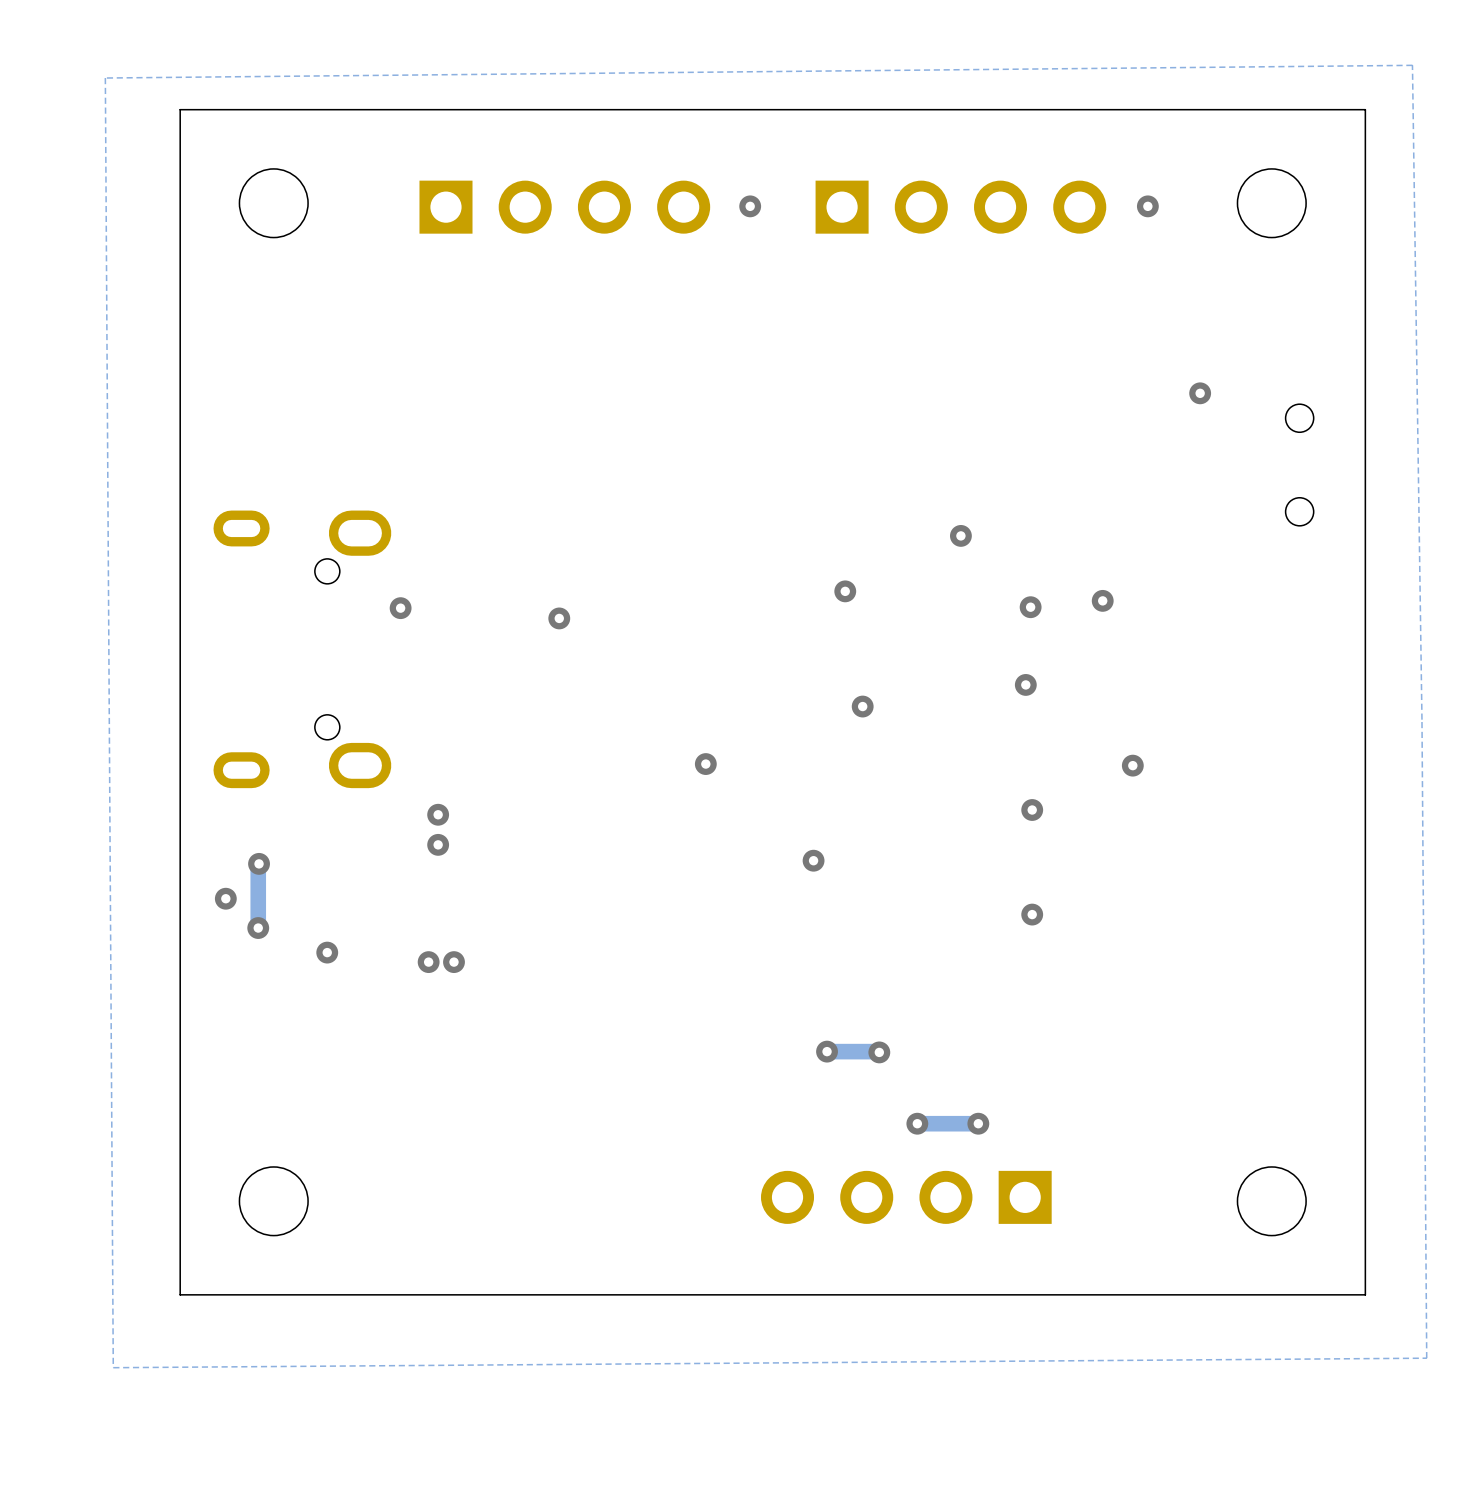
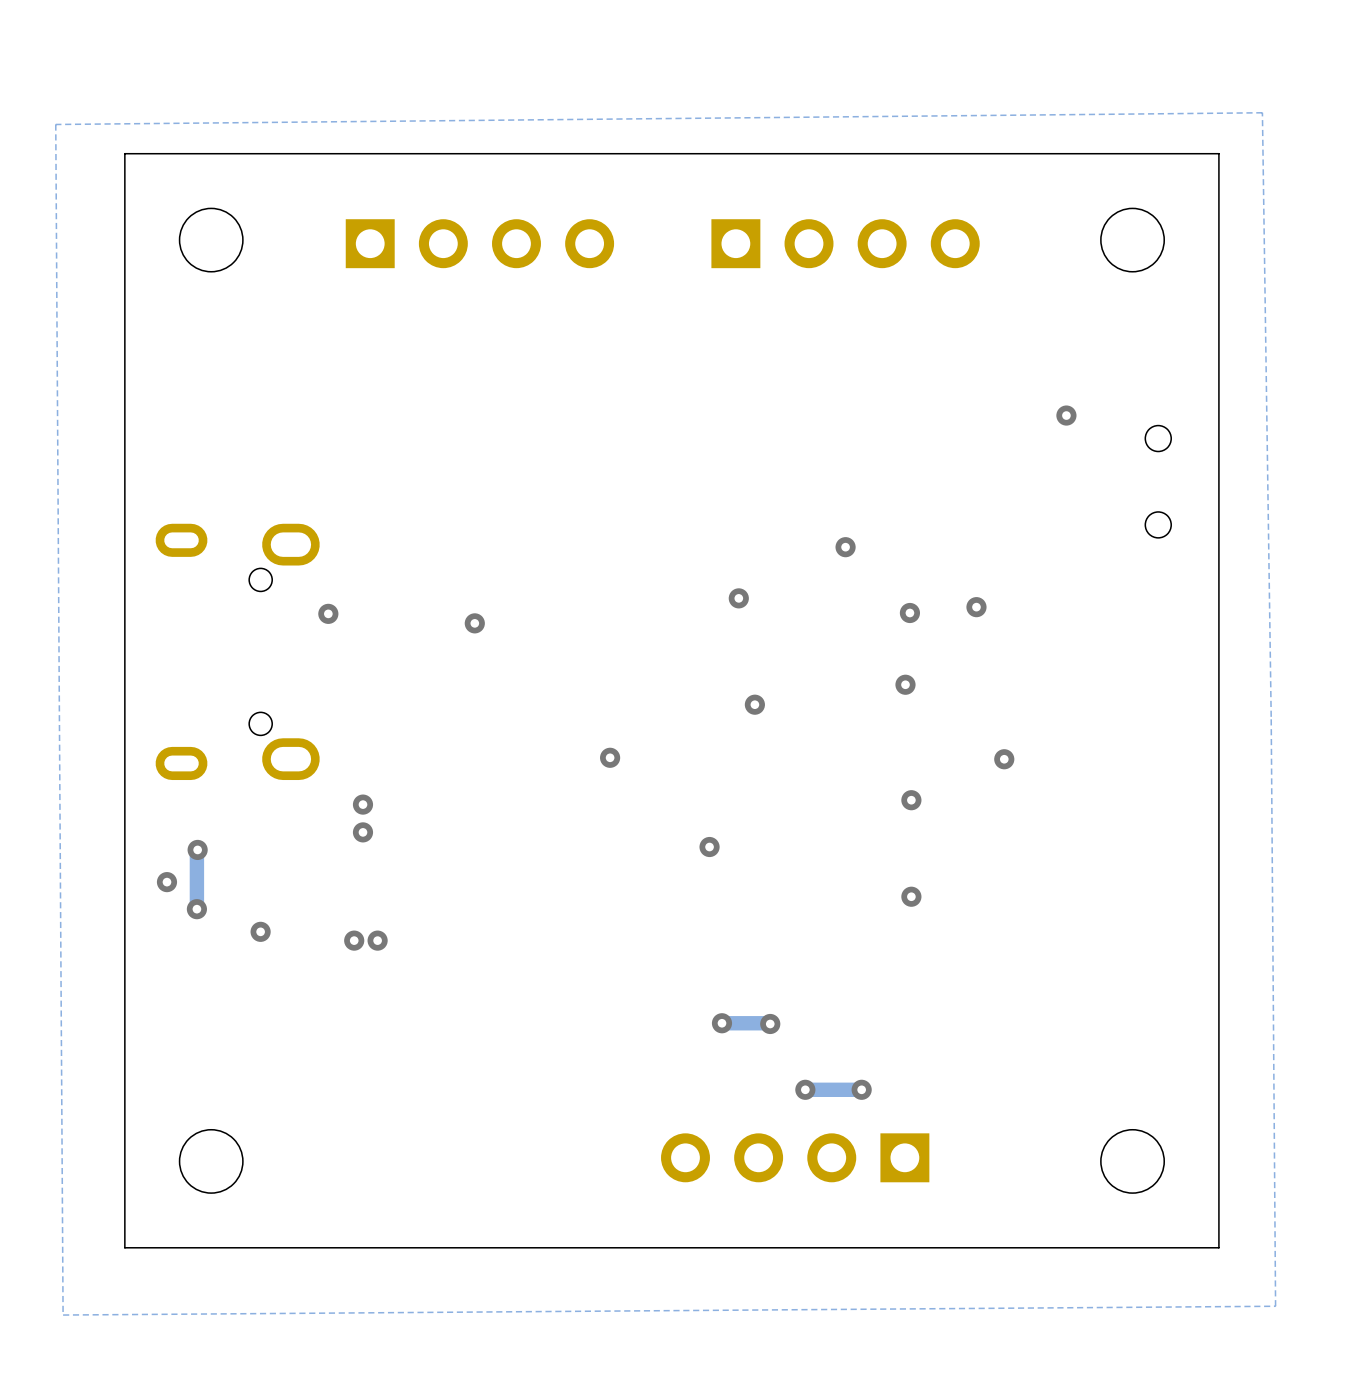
via: (750, 206) -> none
via: (1147, 206) -> none

